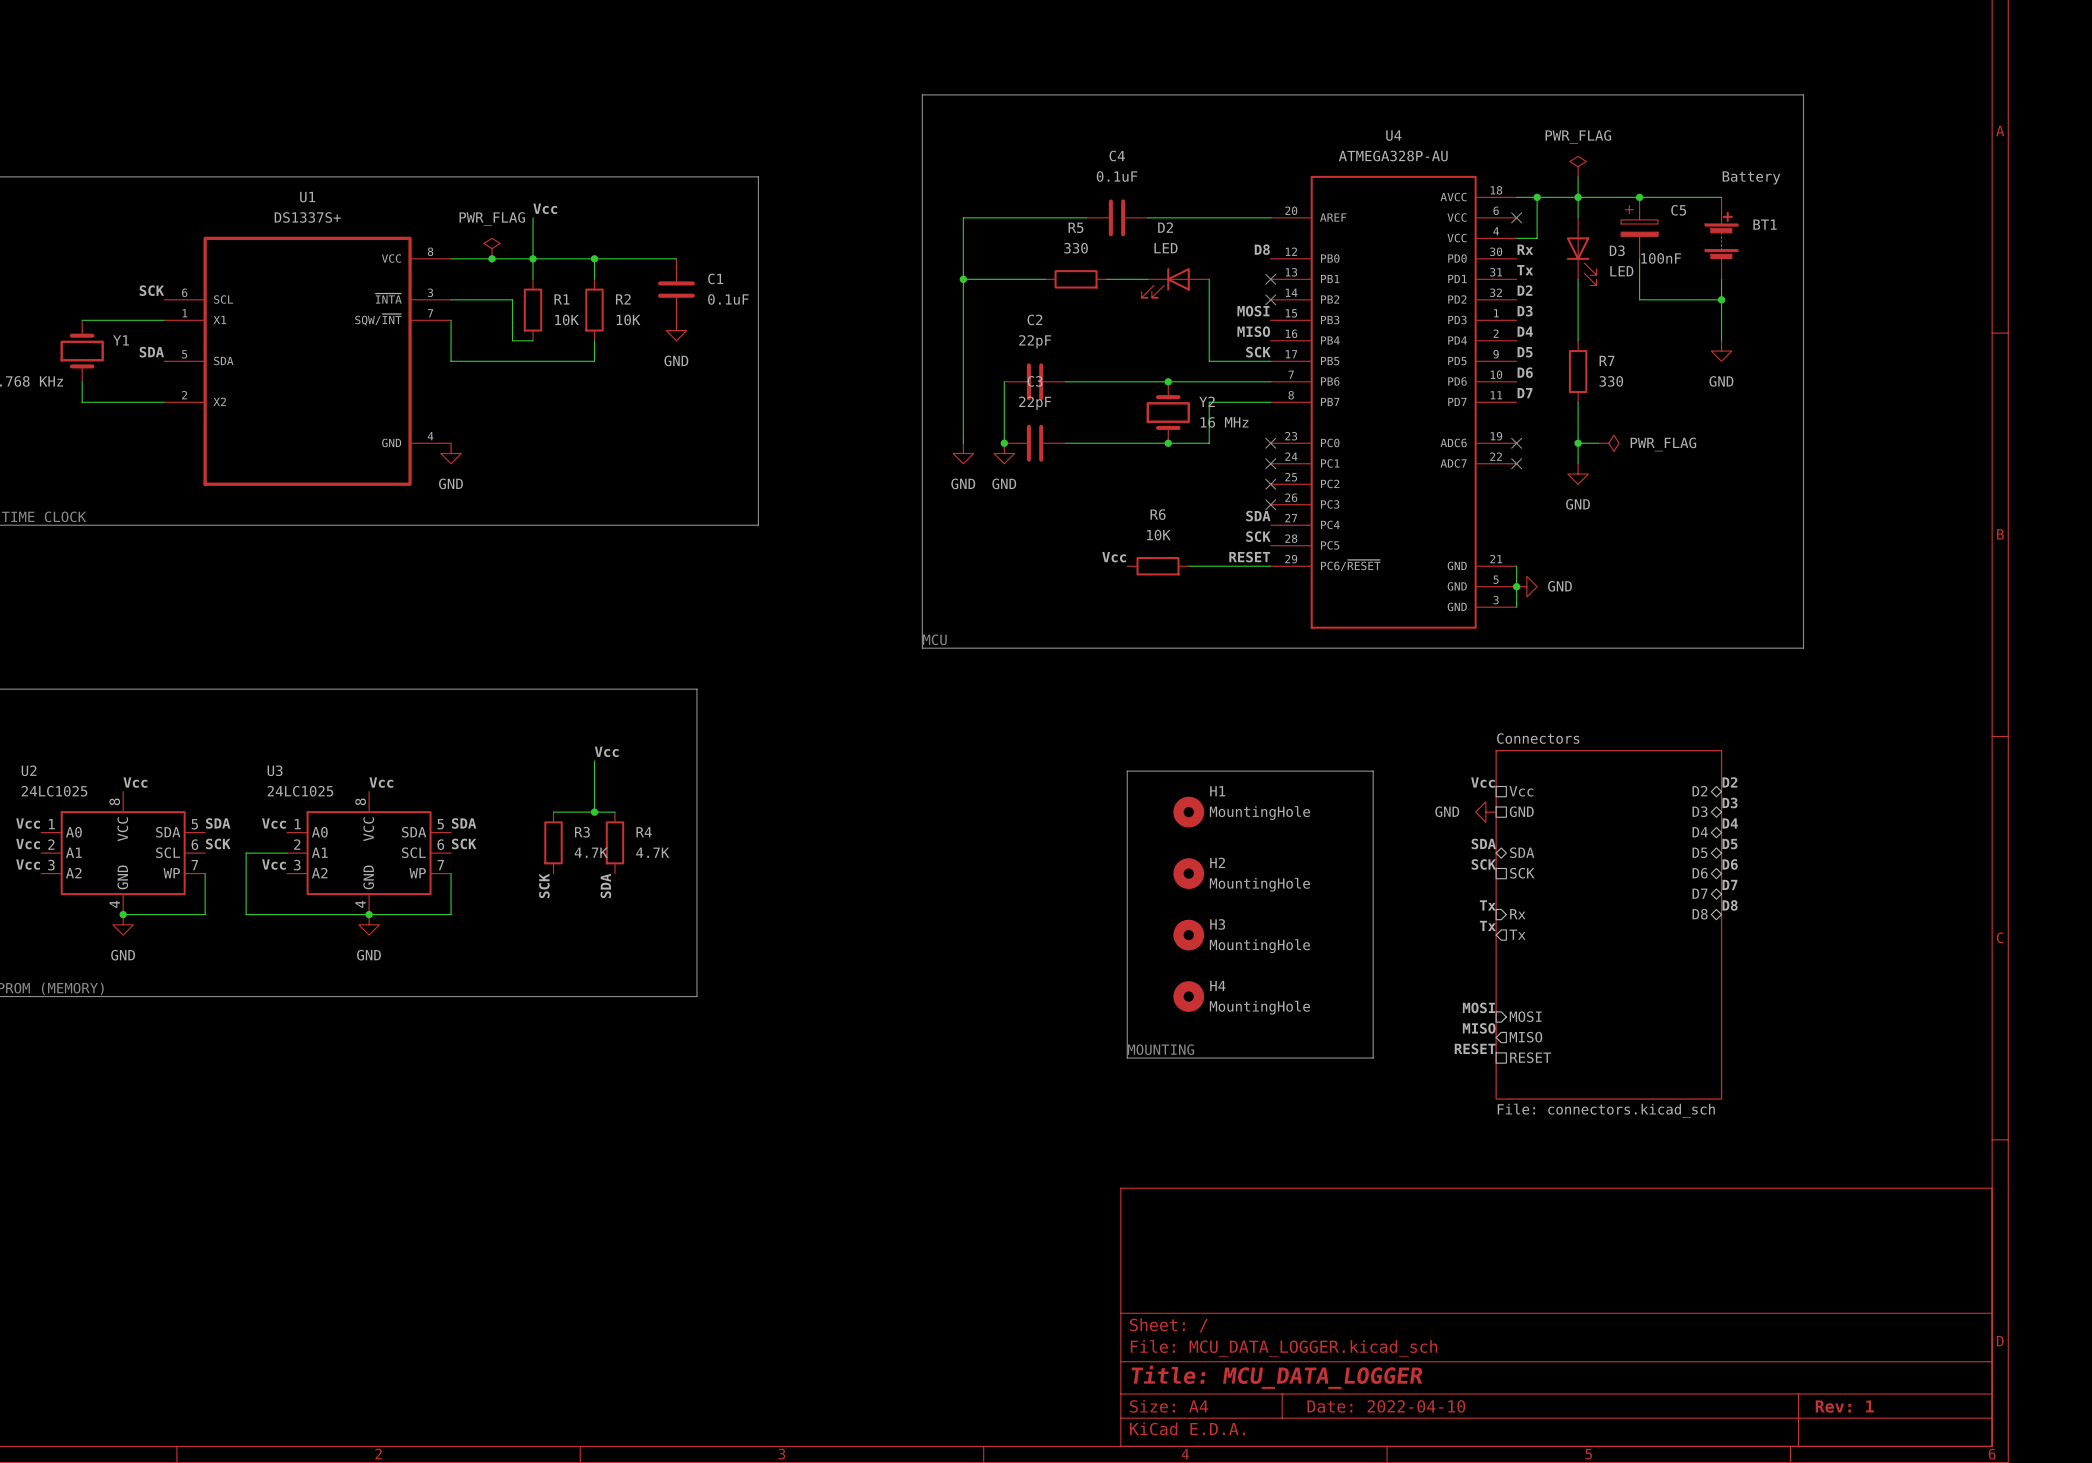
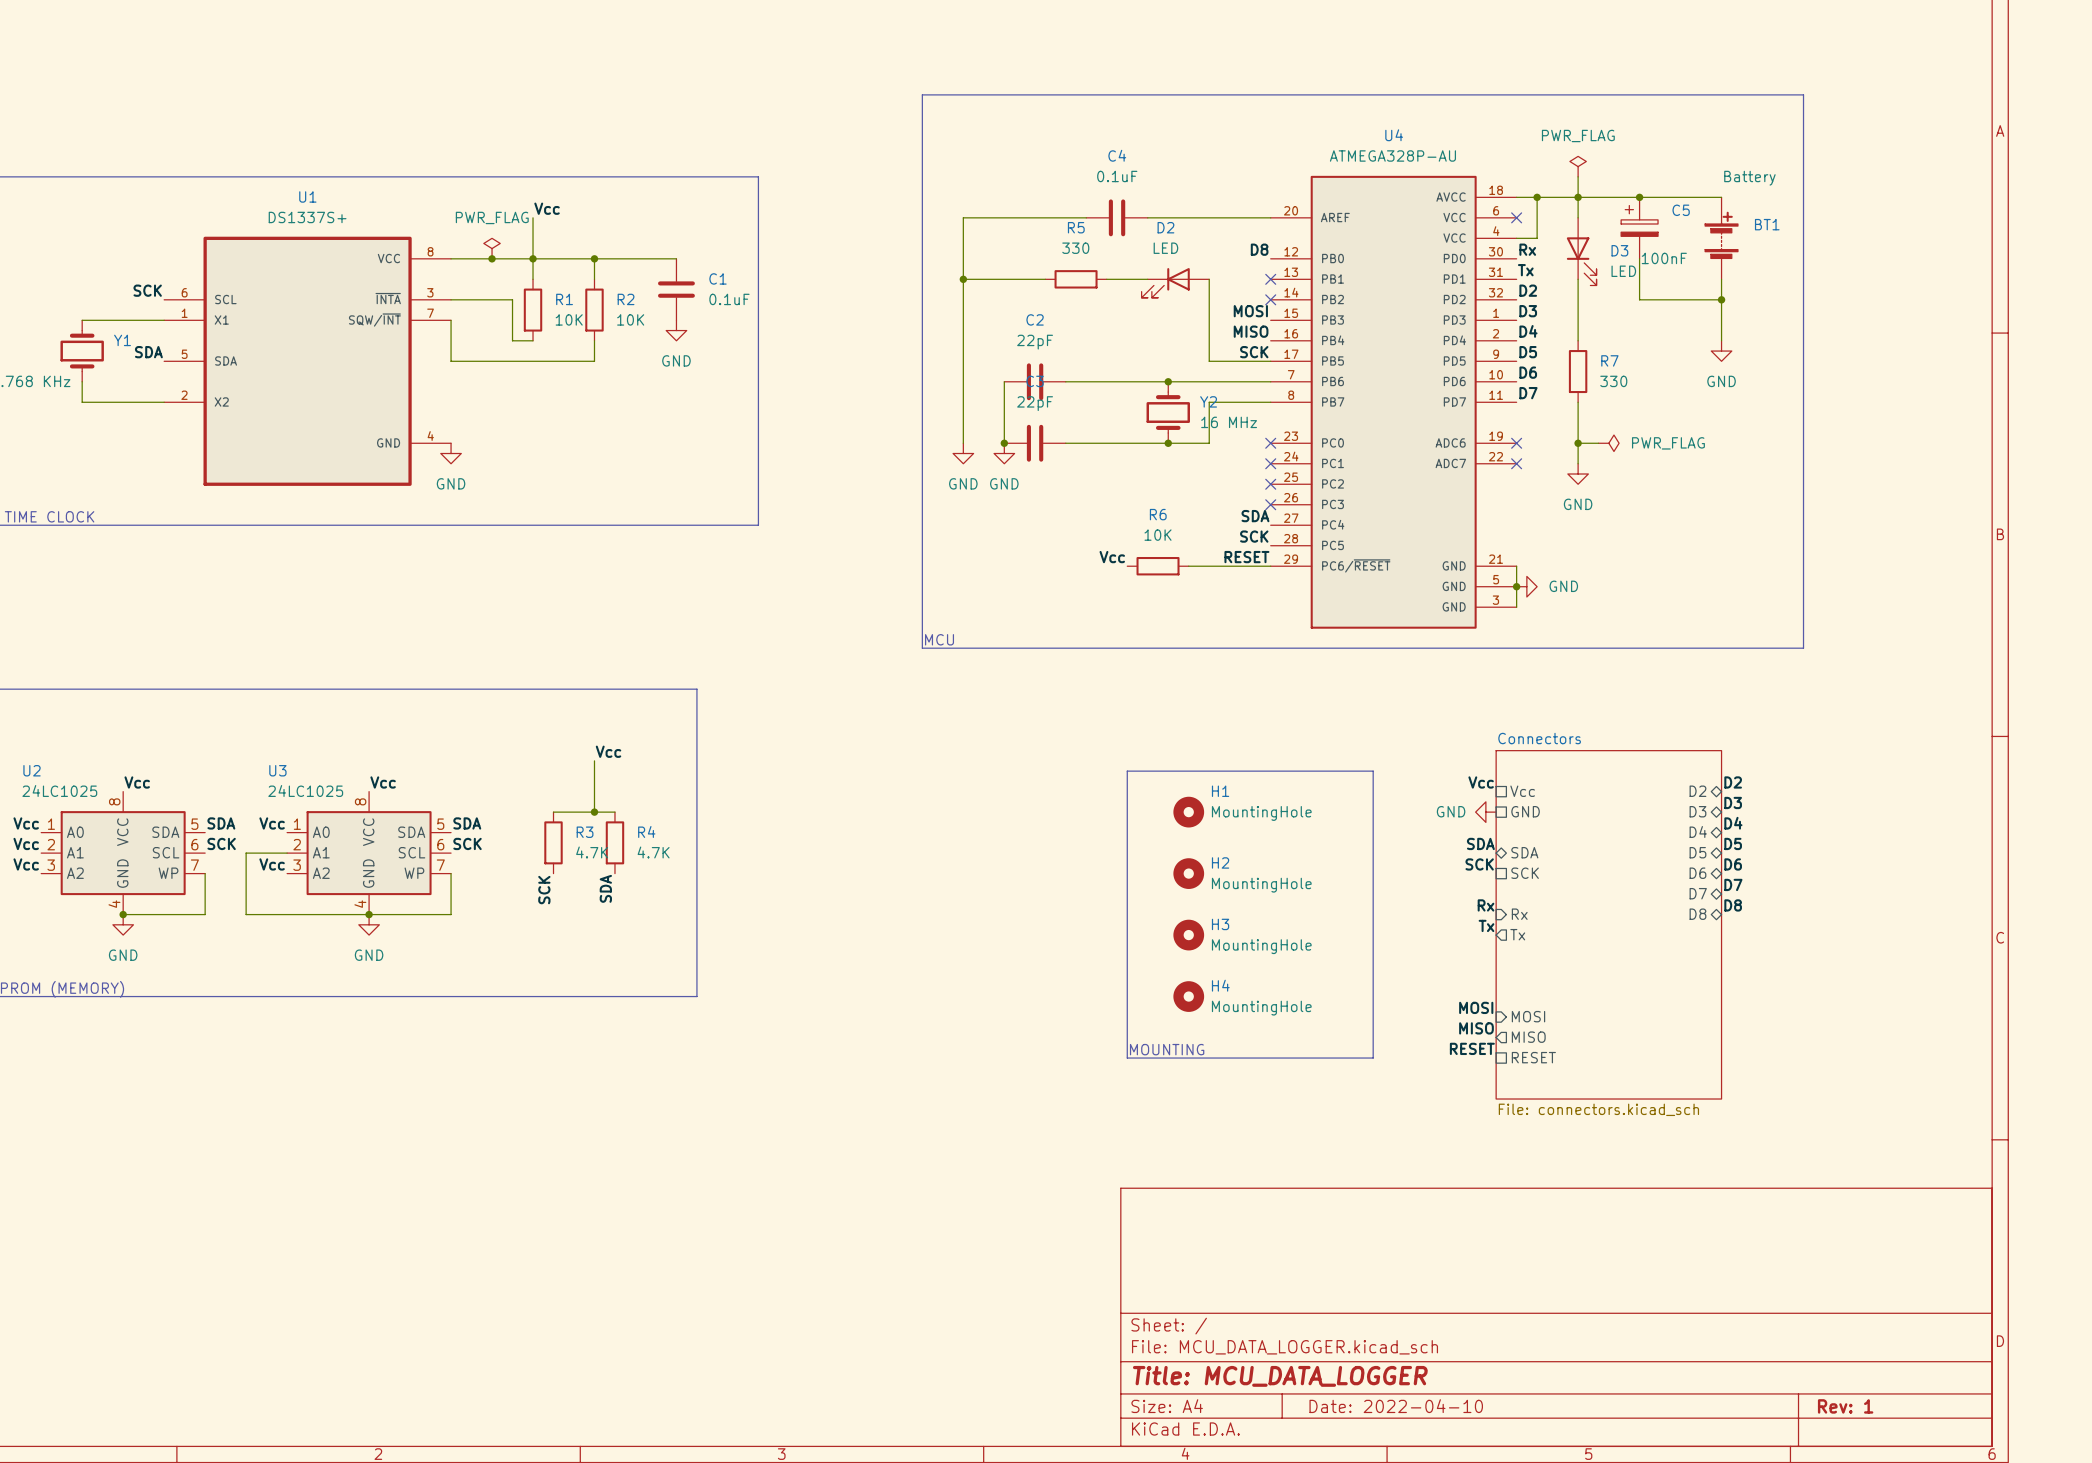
label: Tx (1487, 905) -> Rx (1486, 905)

